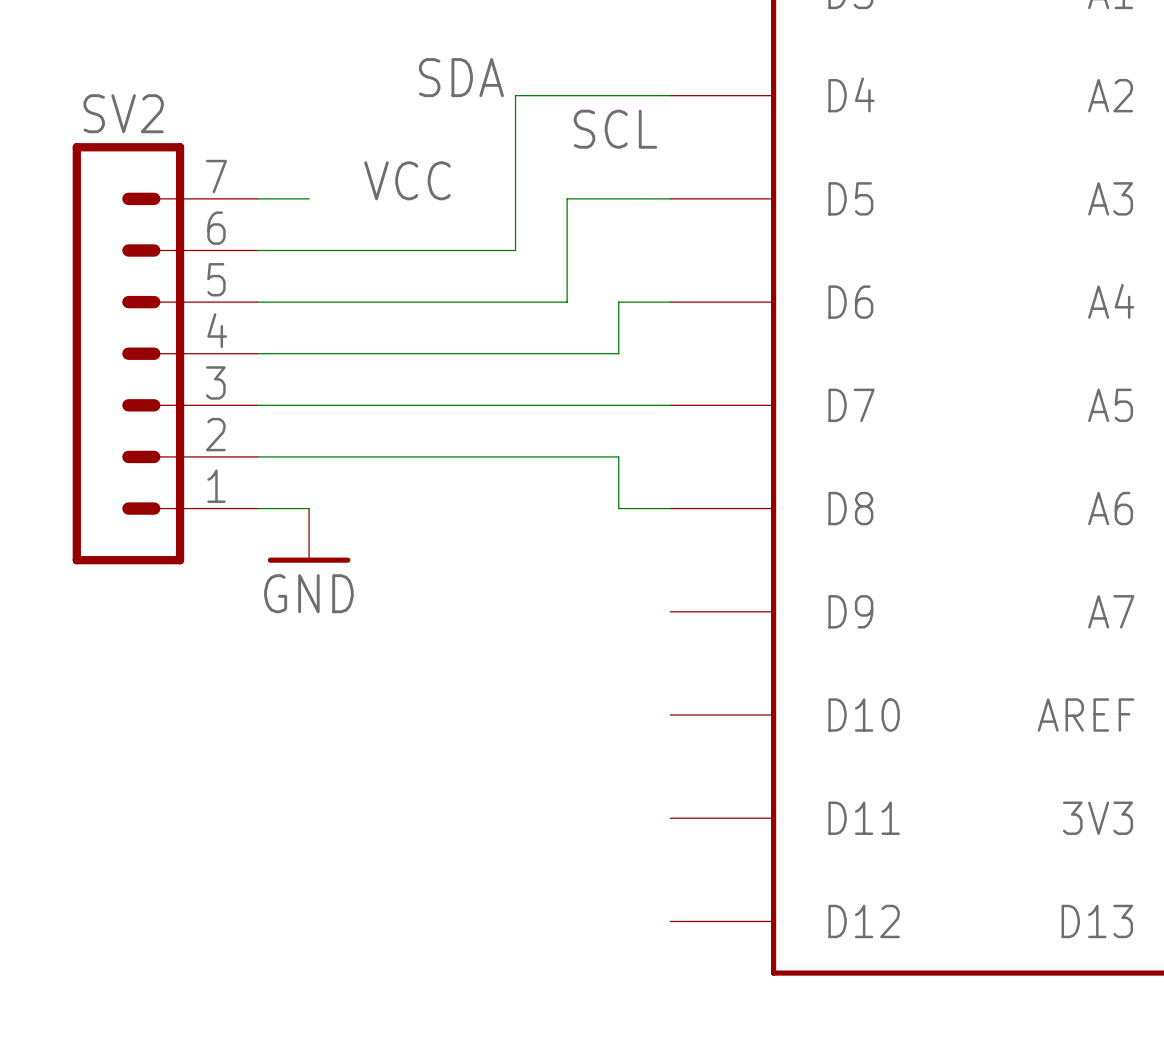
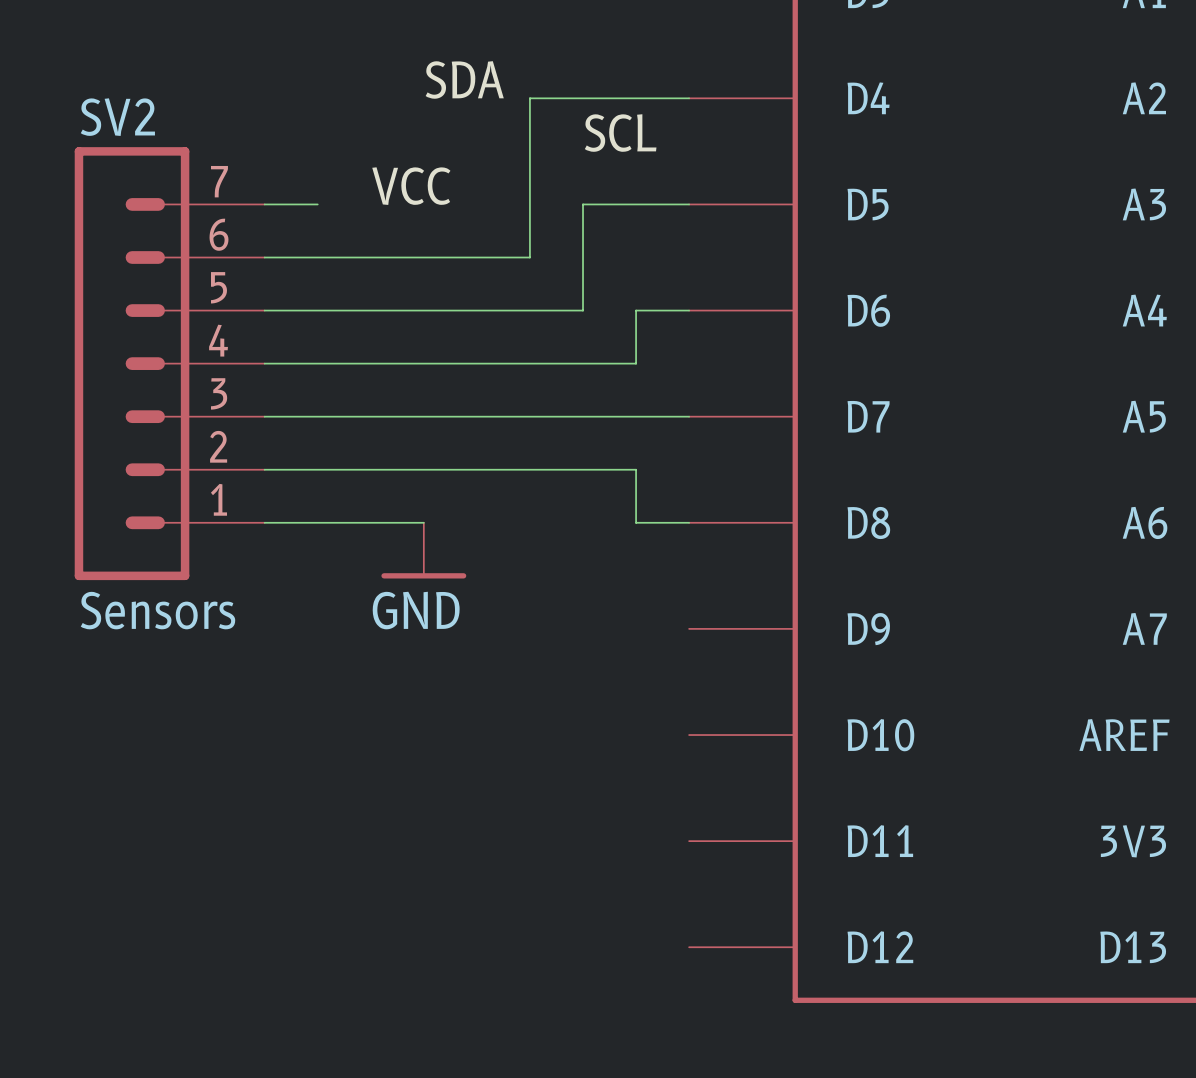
wire: none -> (317, 522) (423, 522)
power symbol position: GND (309, 535) -> GND (423, 550)
SV2 value: none -> Sensors (157, 610)

